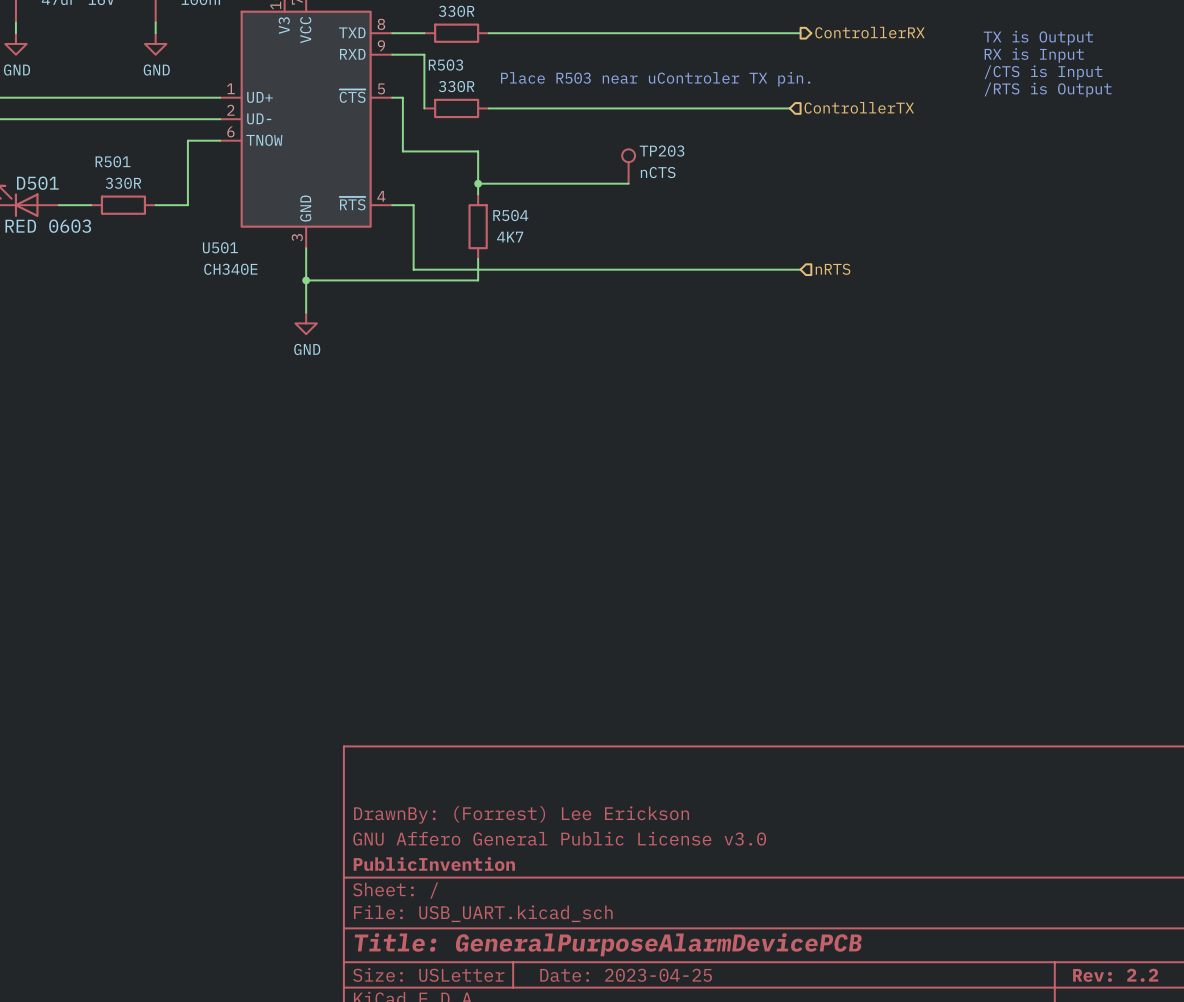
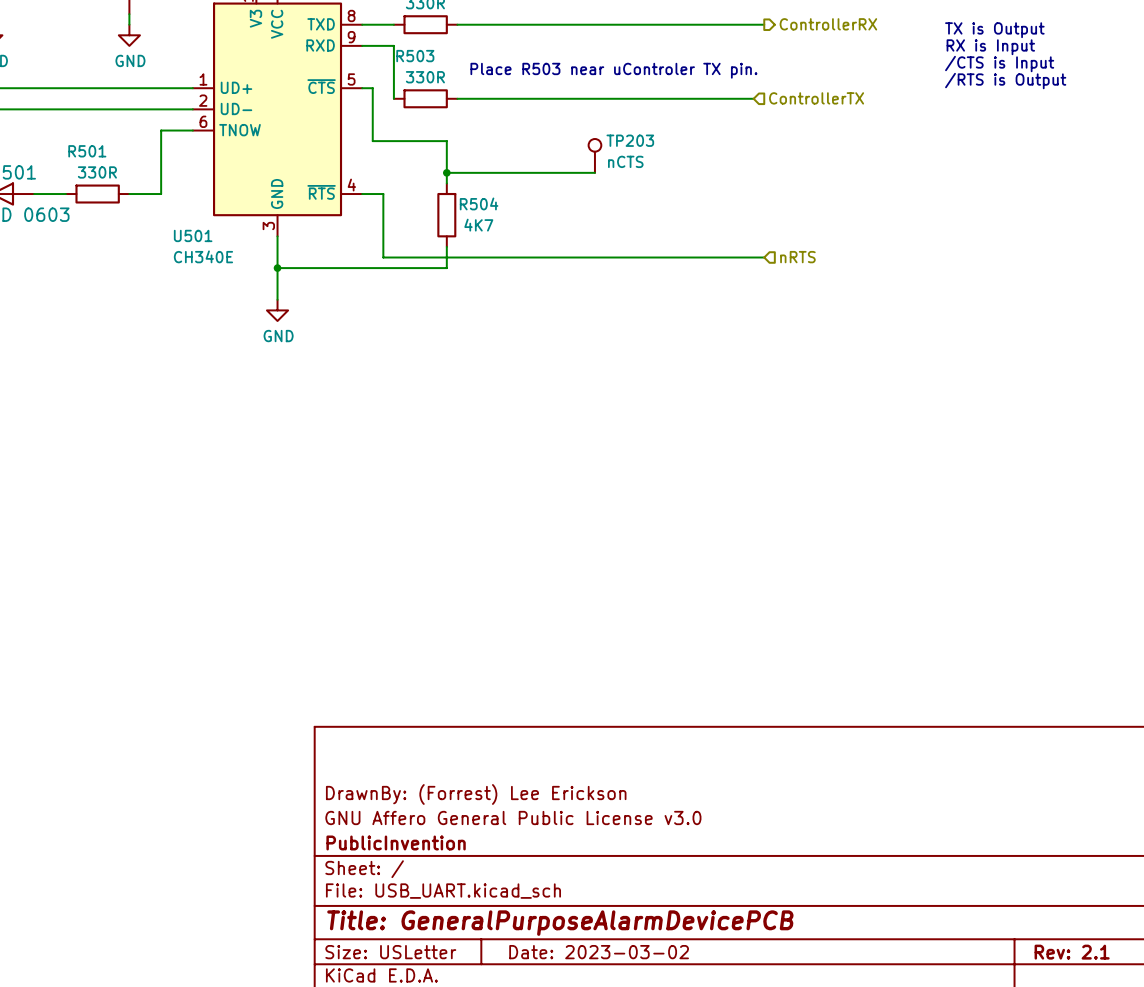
title block: Date: 2023-04-25 (626, 975) -> Date: 2023-03-02 (599, 952)
title block: Rev: 2.2 (1115, 975) -> Rev: 2.1 (1072, 952)

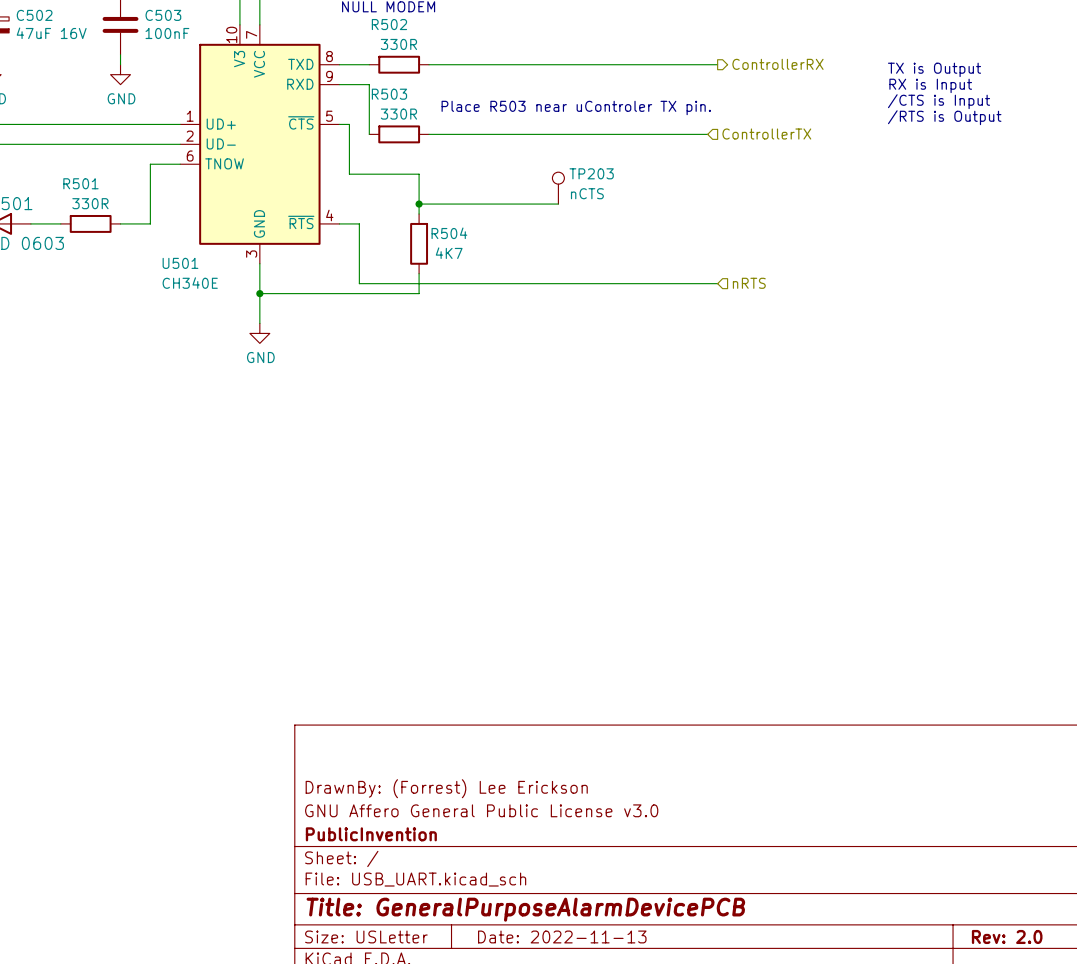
title block: Date: 2023-03-02 (599, 952) -> Date: 2022-11-13 (562, 936)
title block: Rev: 2.1 (1072, 952) -> Rev: 2.0 (1007, 936)

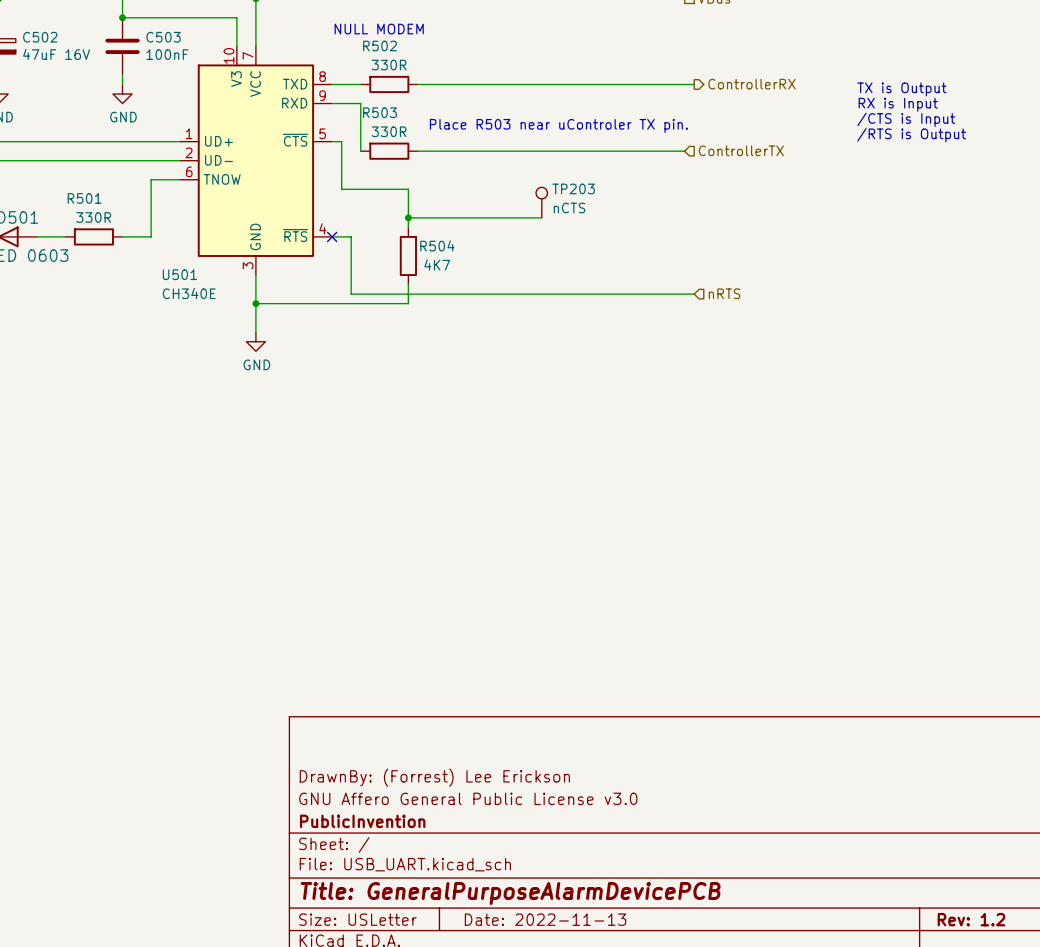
no-connect mark: none -> (332, 236)
title block: Rev: 2.0 (1007, 936) -> Rev: 1.2 (971, 919)

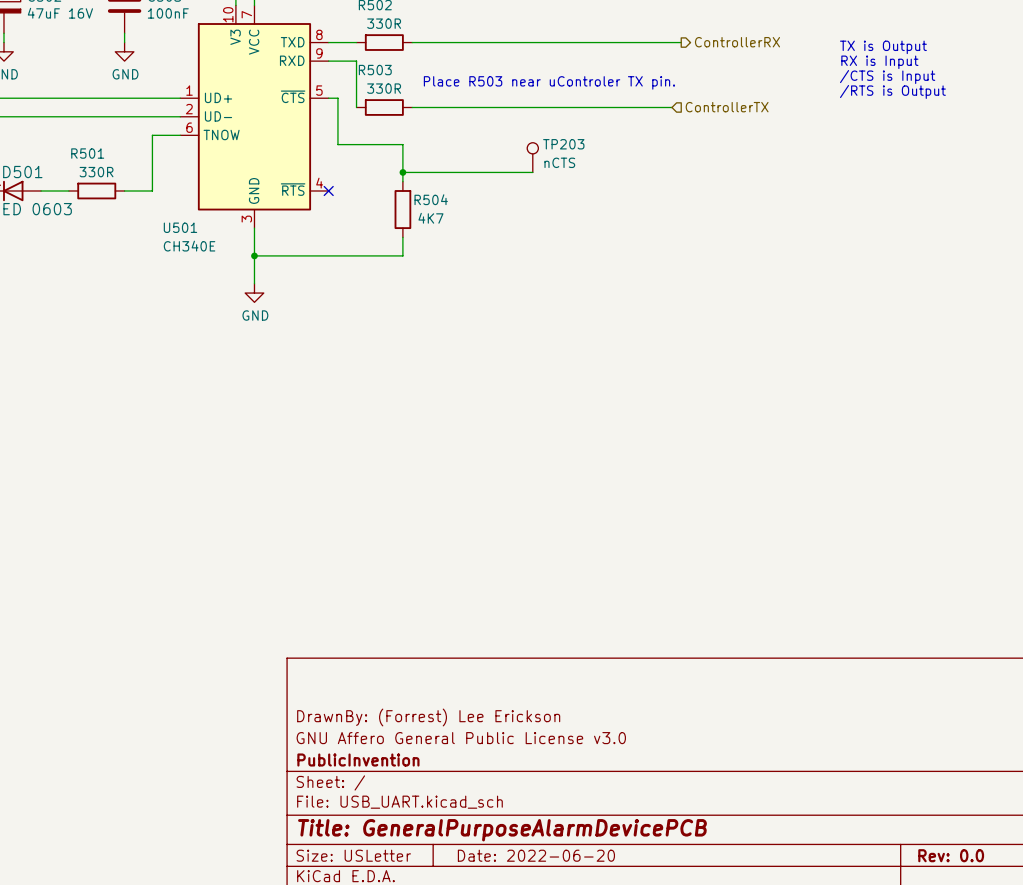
wire: (332, 236) (351, 236) (351, 294) (694, 294) -> none
hierarchical label: nRTS (724, 293) -> none
title block: Date: 2022-11-13 (545, 919) -> Date: 2022-06-20 (536, 855)
title block: Rev: 1.2 (971, 919) -> Rev: 0.0 (951, 855)

